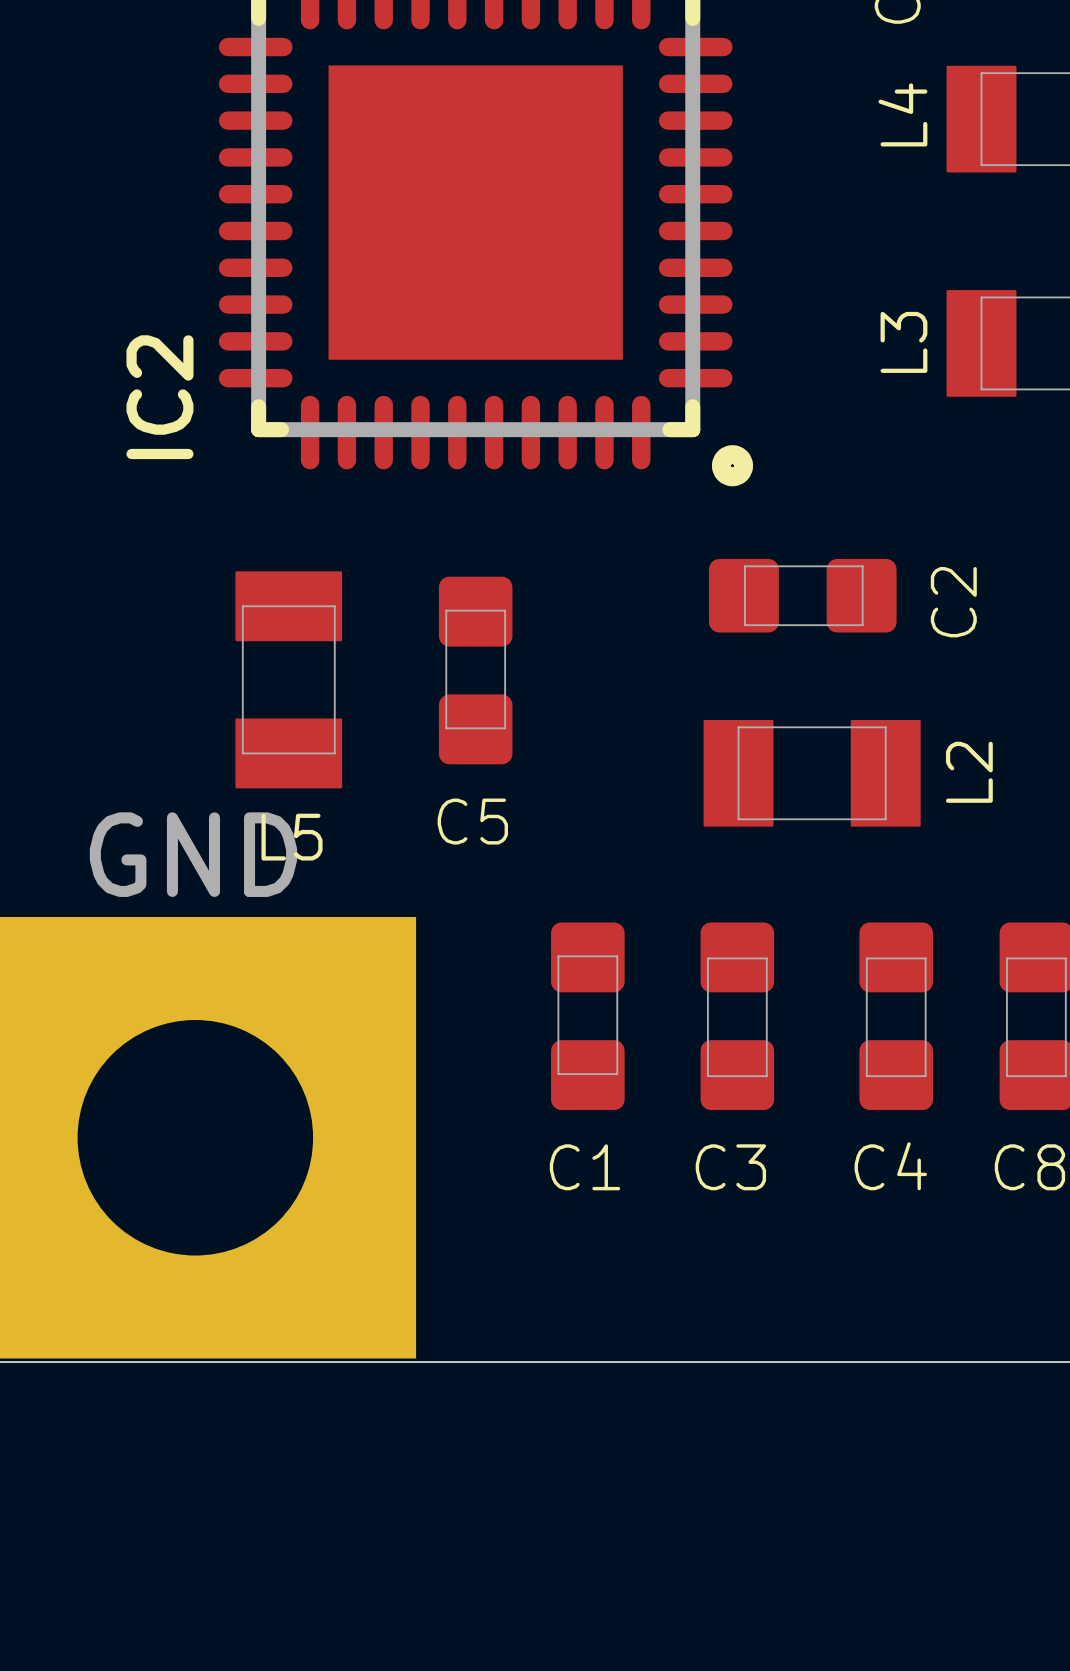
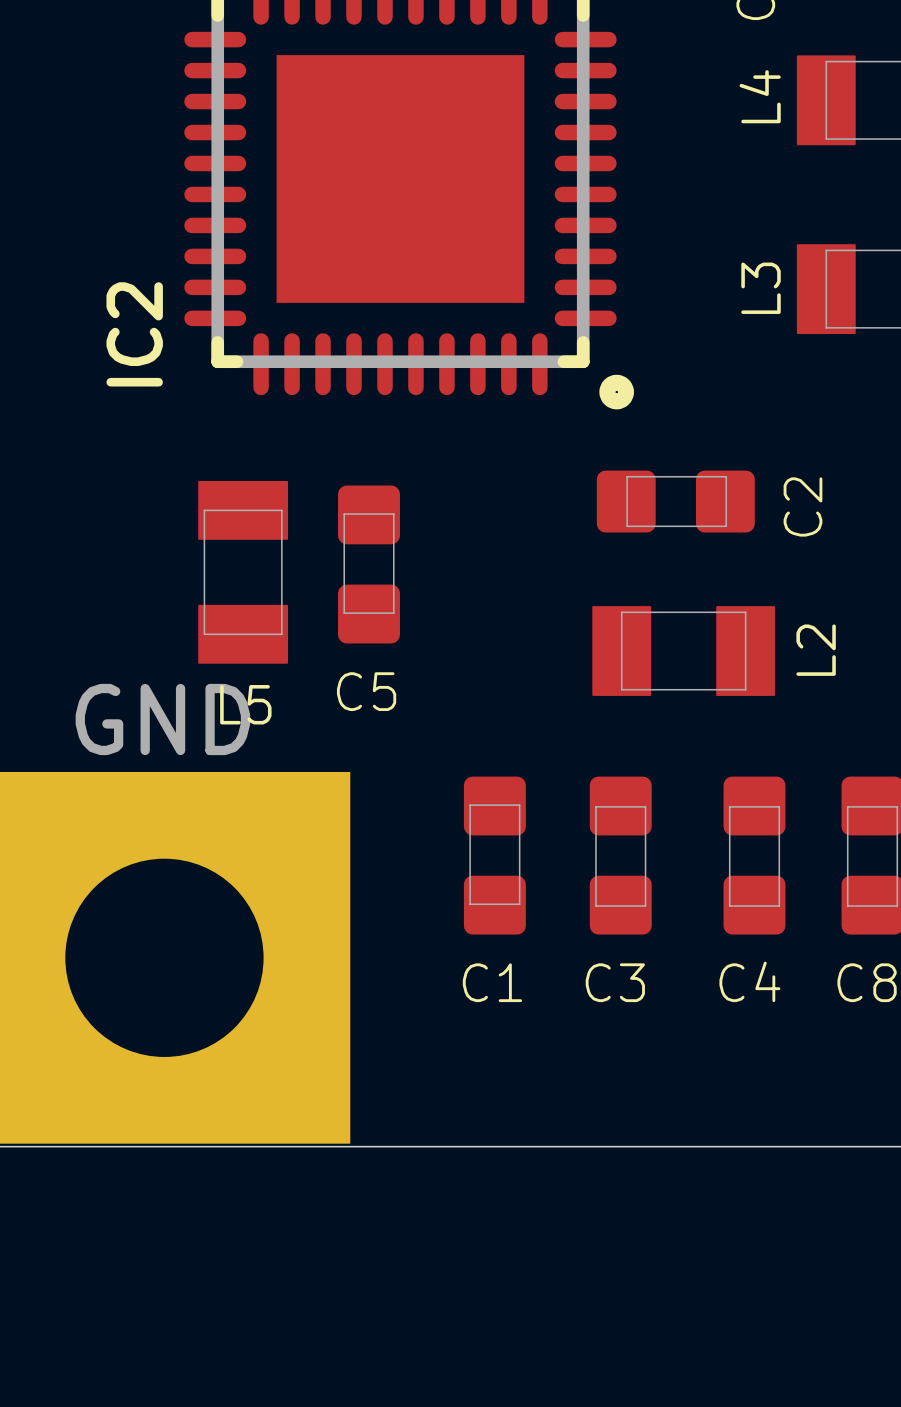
C5 position: (475, 670) -> (369, 564)

